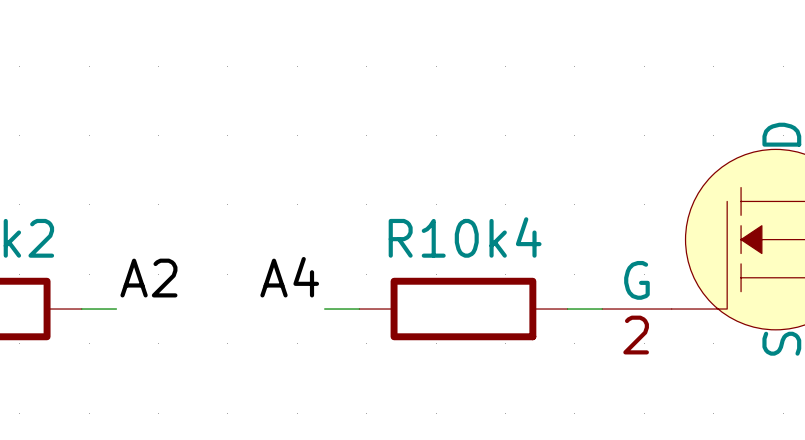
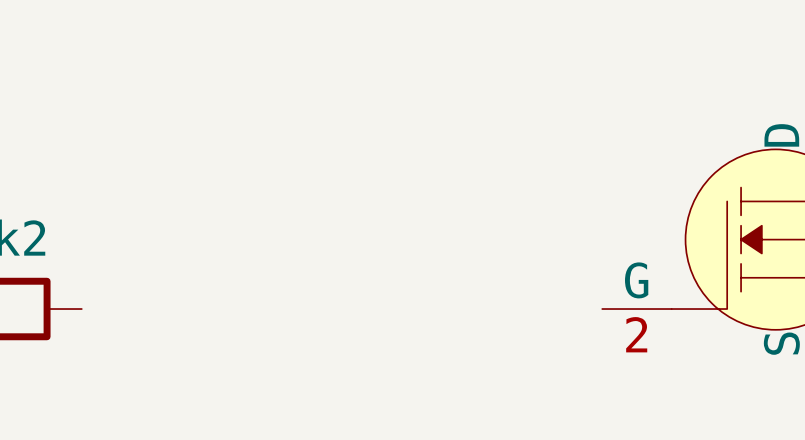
label: A4 (289, 277) -> none
label: A2 (148, 278) -> none
wire: (81, 309) (116, 309) -> none
wire: (324, 309) (359, 309) -> none
R10k4: (463, 309) -> none
wire: (567, 309) (602, 309) -> none

